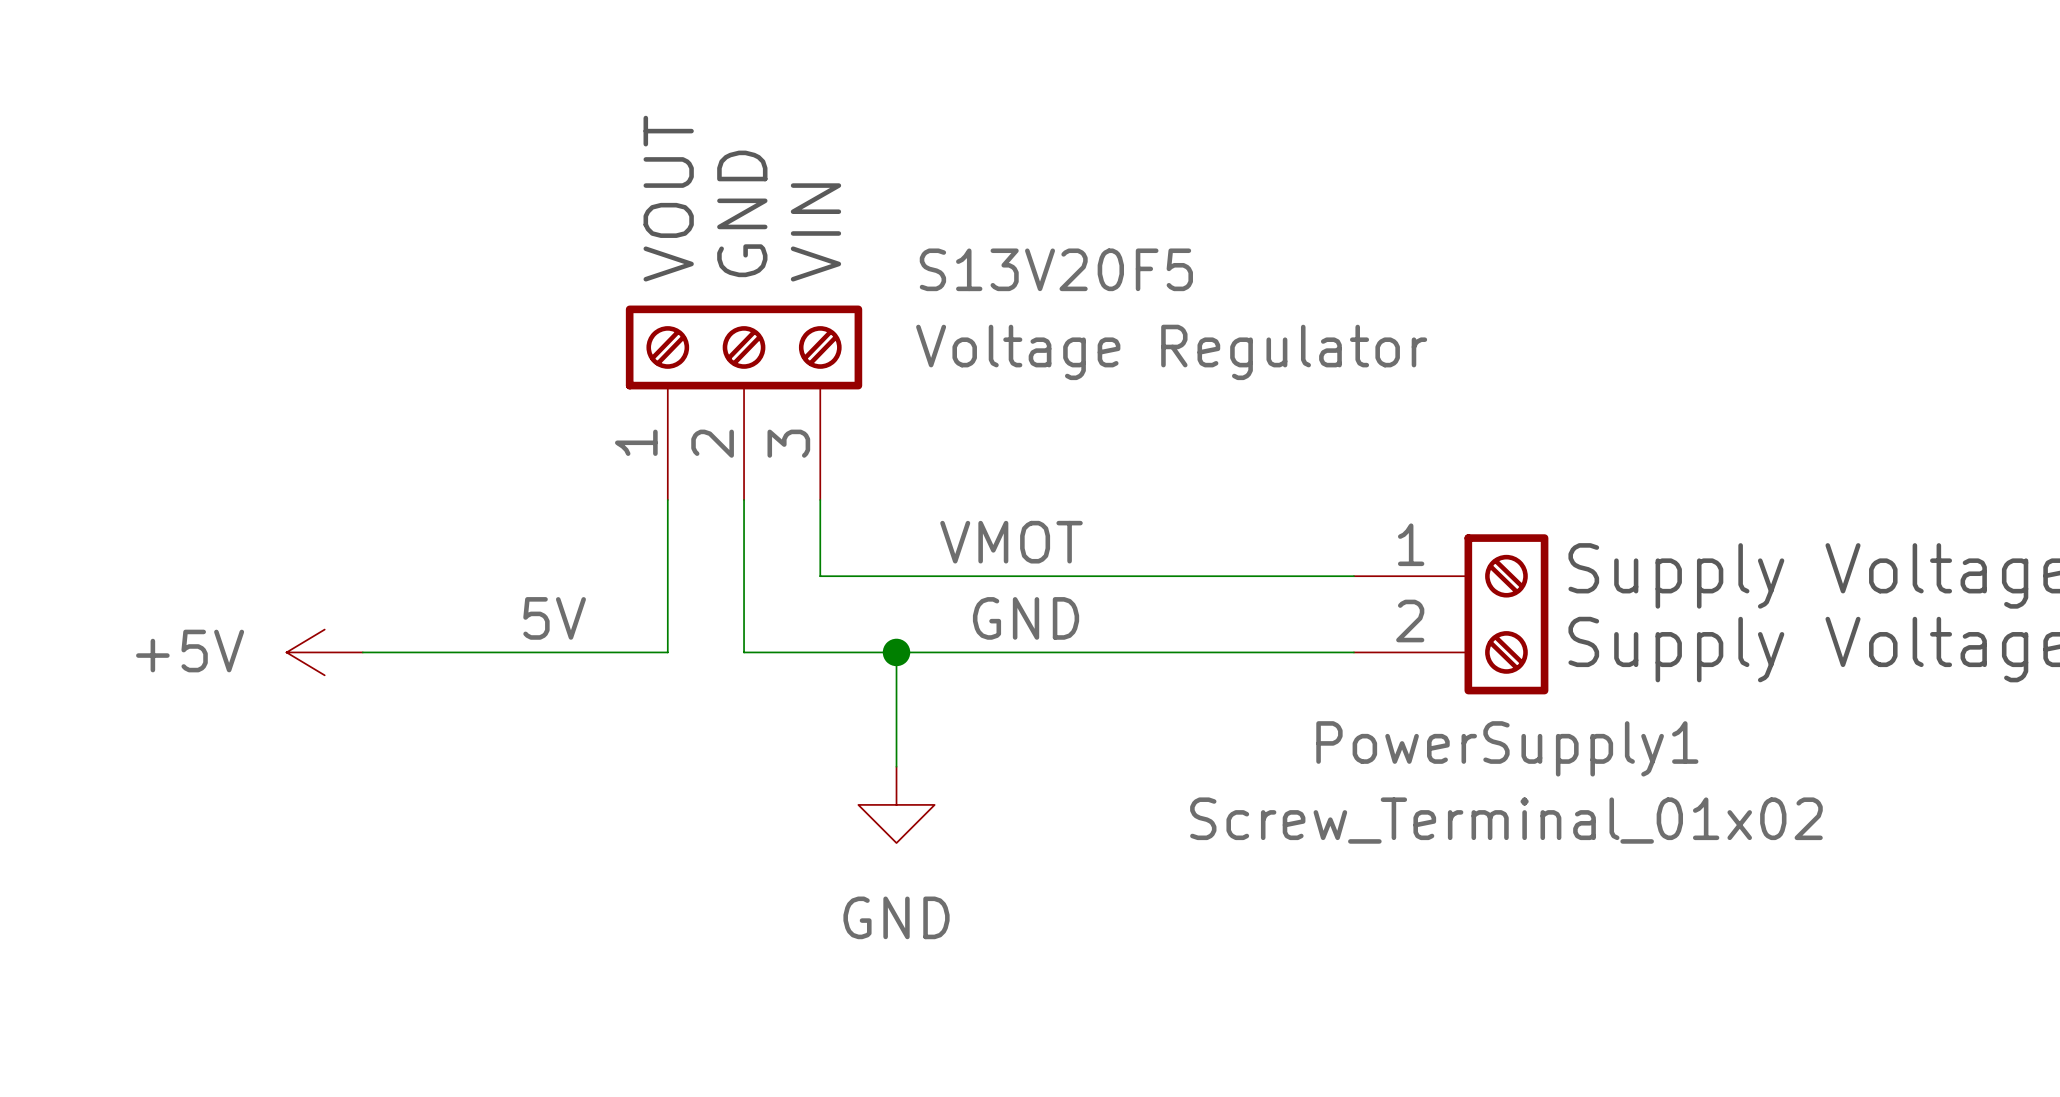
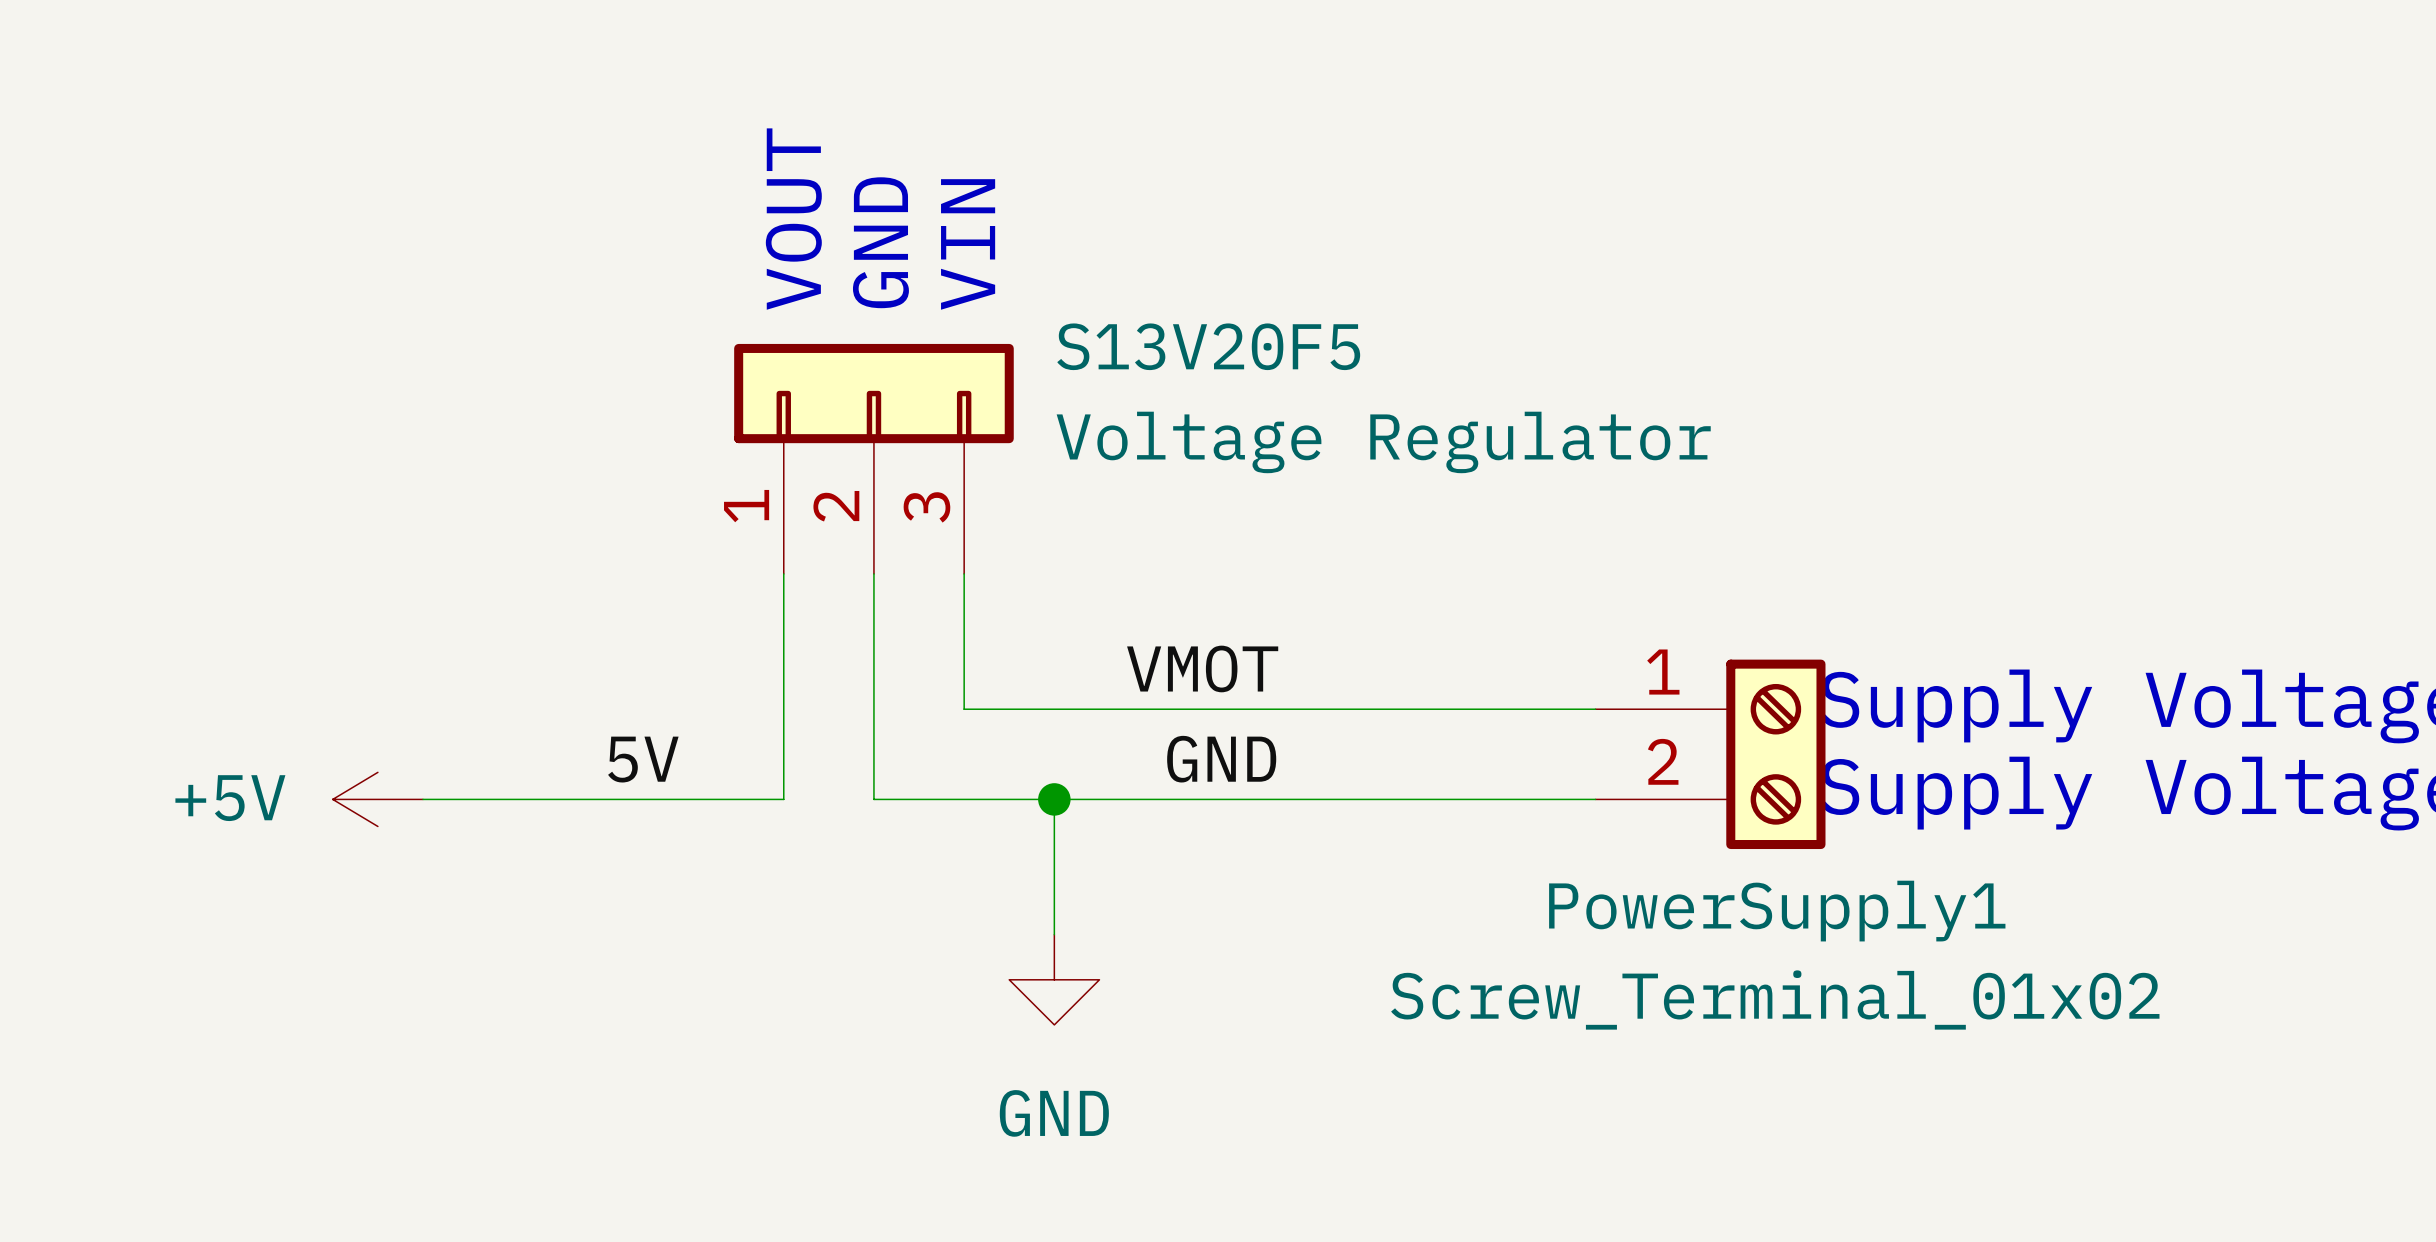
text position: VOUT (668, 198) -> VOUT (793, 219)
text position: GND (742, 213) -> GND (880, 242)
text position: VIN (815, 232) -> VIN (968, 244)
S13V20F5 symbol: [625, 305, 863, 500] -> [734, 343, 1014, 574]

